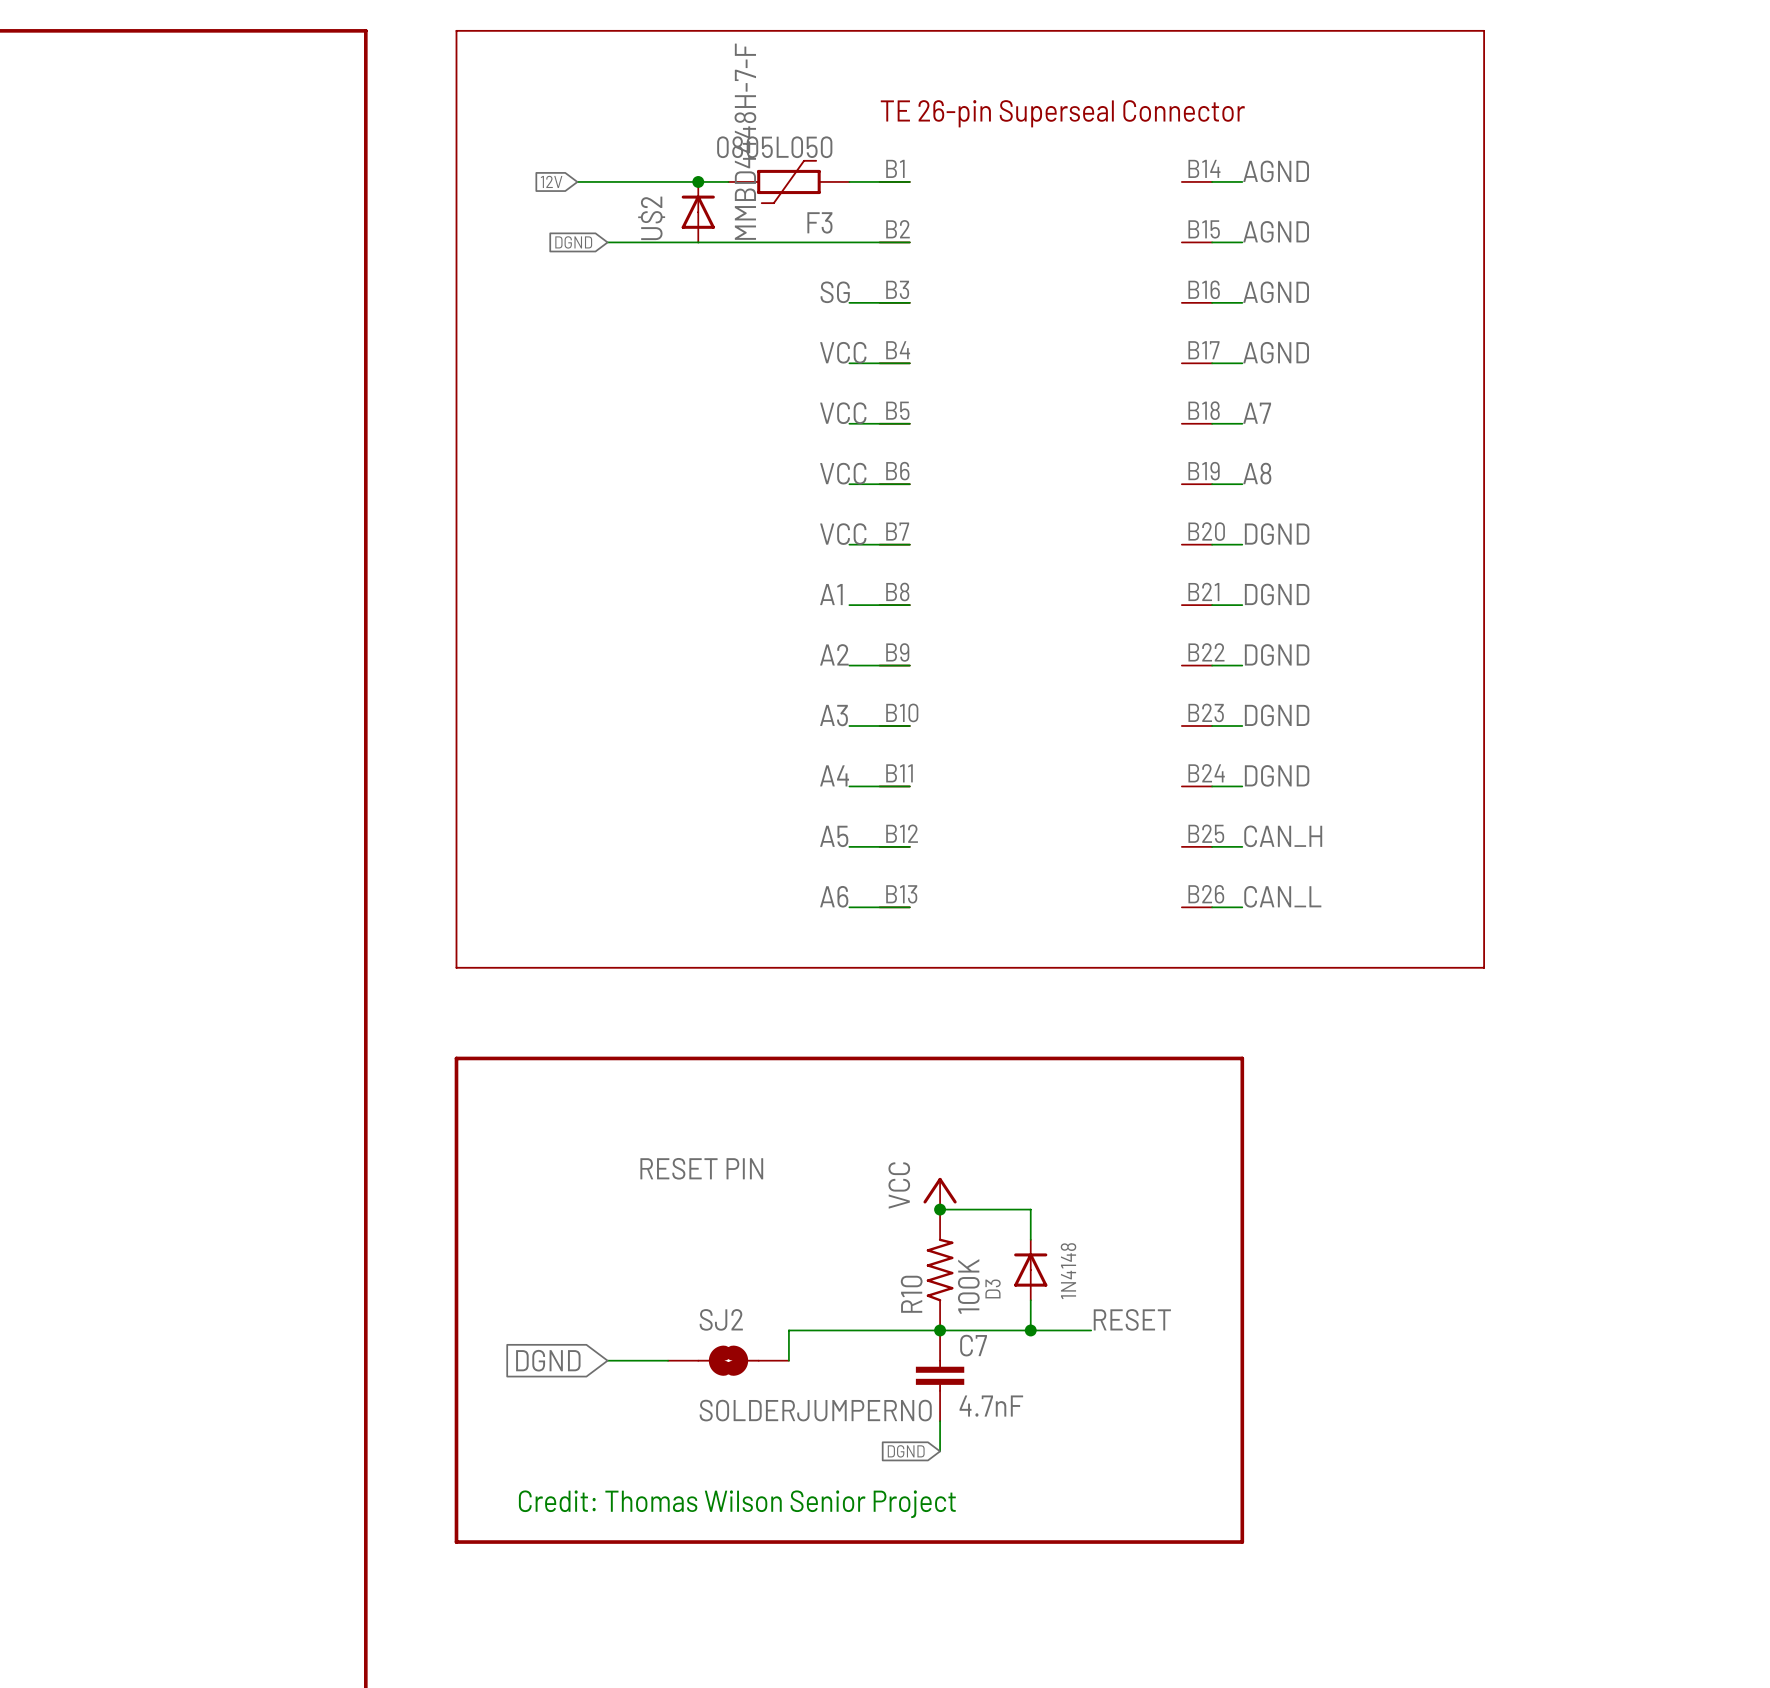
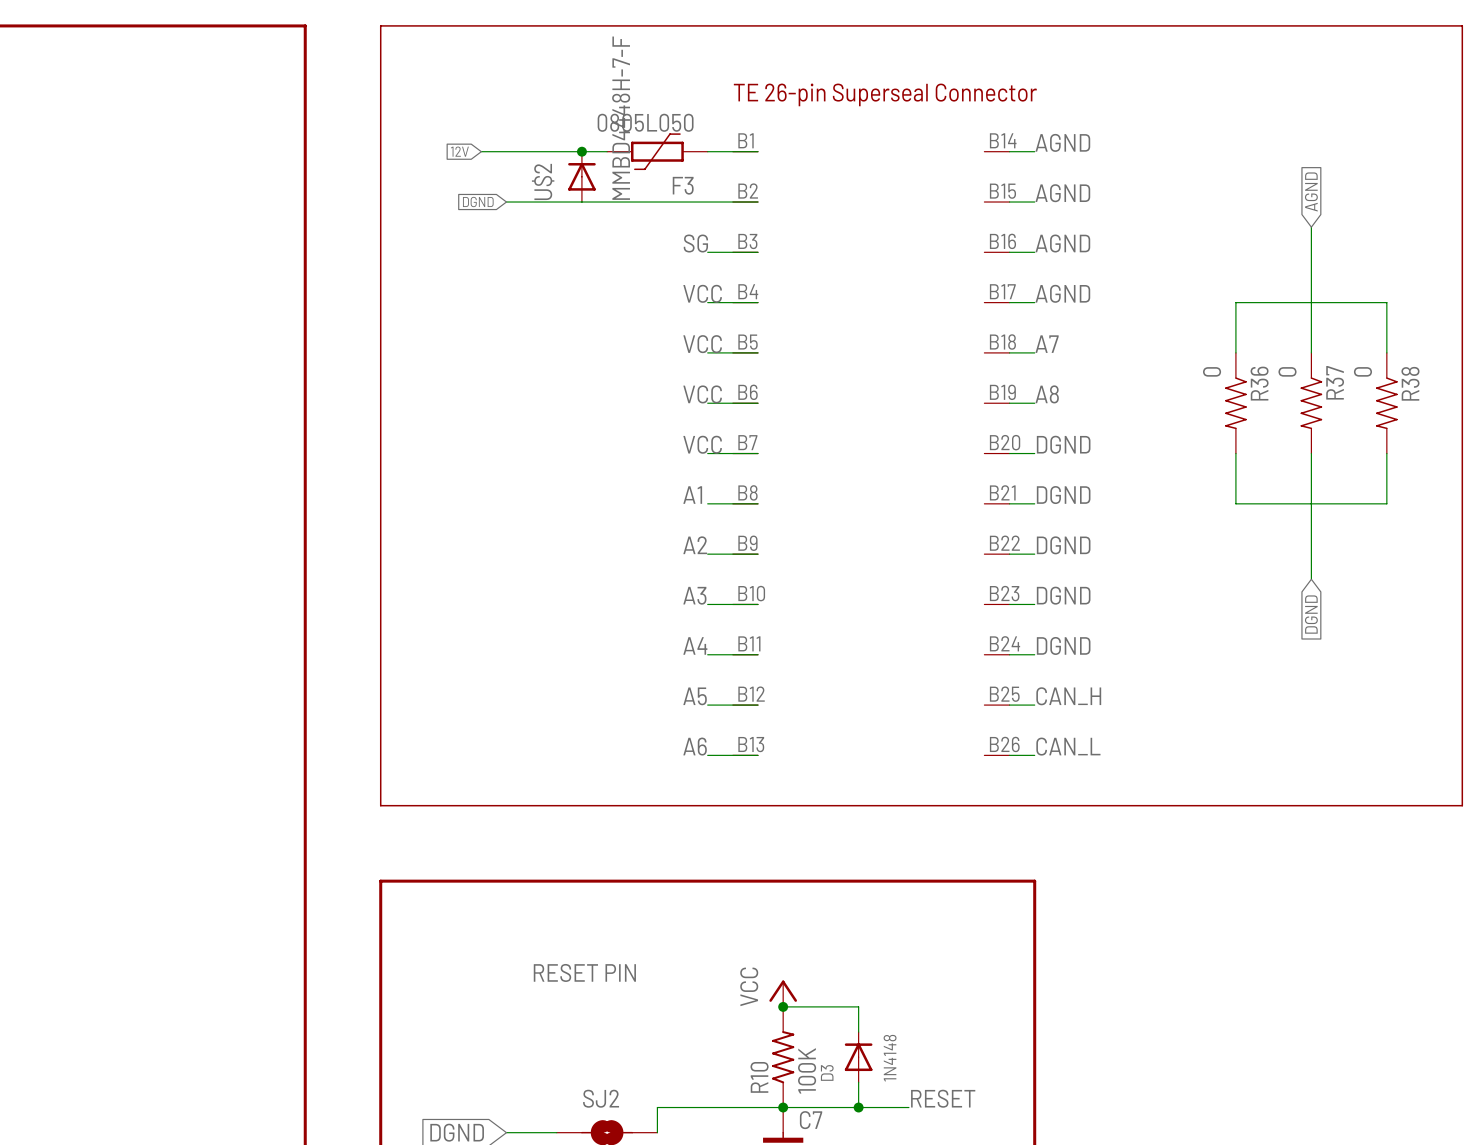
line: (1484, 30) (1484, 967) -> (1235, 25) (1462, 25) (1462, 805) (1235, 805)
global label: none -> AGND (1311, 191)
wire: none -> (1311, 227) (1311, 352)
wire: none -> (1235, 352) (1235, 302) (1386, 302) (1386, 352)
R36: none -> 0 (1235, 403)
R37: none -> 0 (1311, 403)
R38: none -> 0 (1386, 403)
wire: none -> (1235, 453) (1235, 503) (1386, 503) (1386, 453)
wire: none -> (1311, 453) (1311, 579)
global label: none -> DGND (1311, 614)

